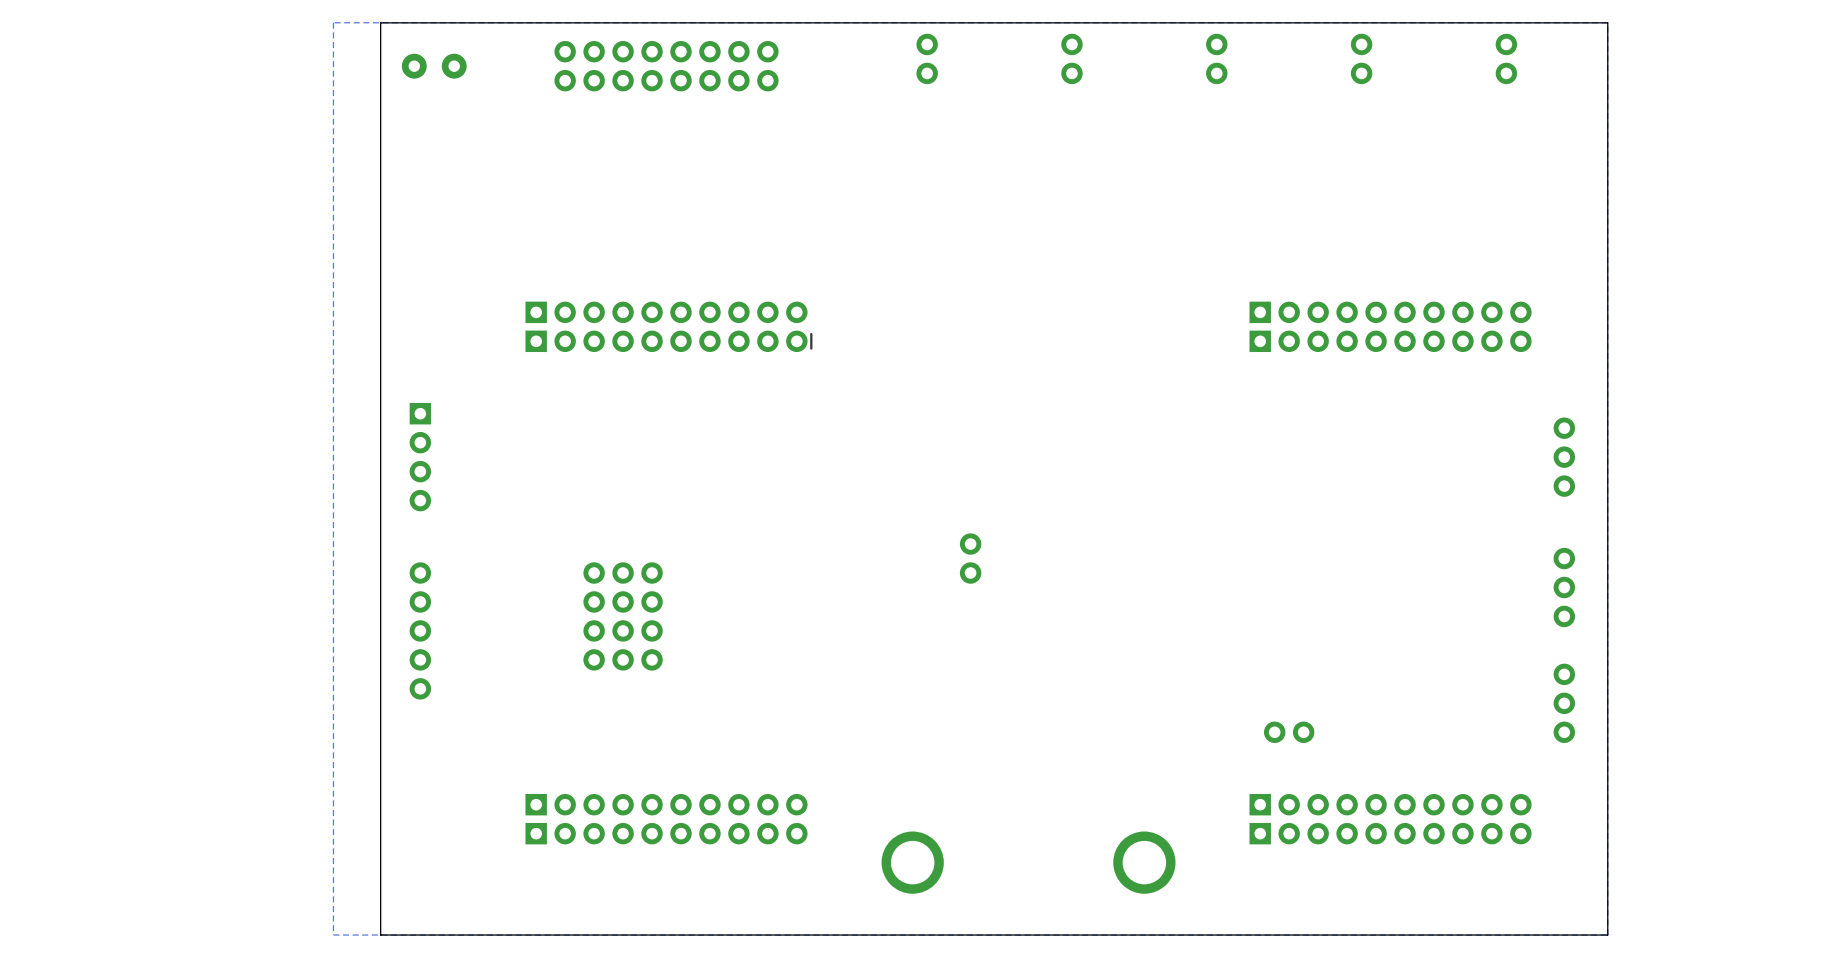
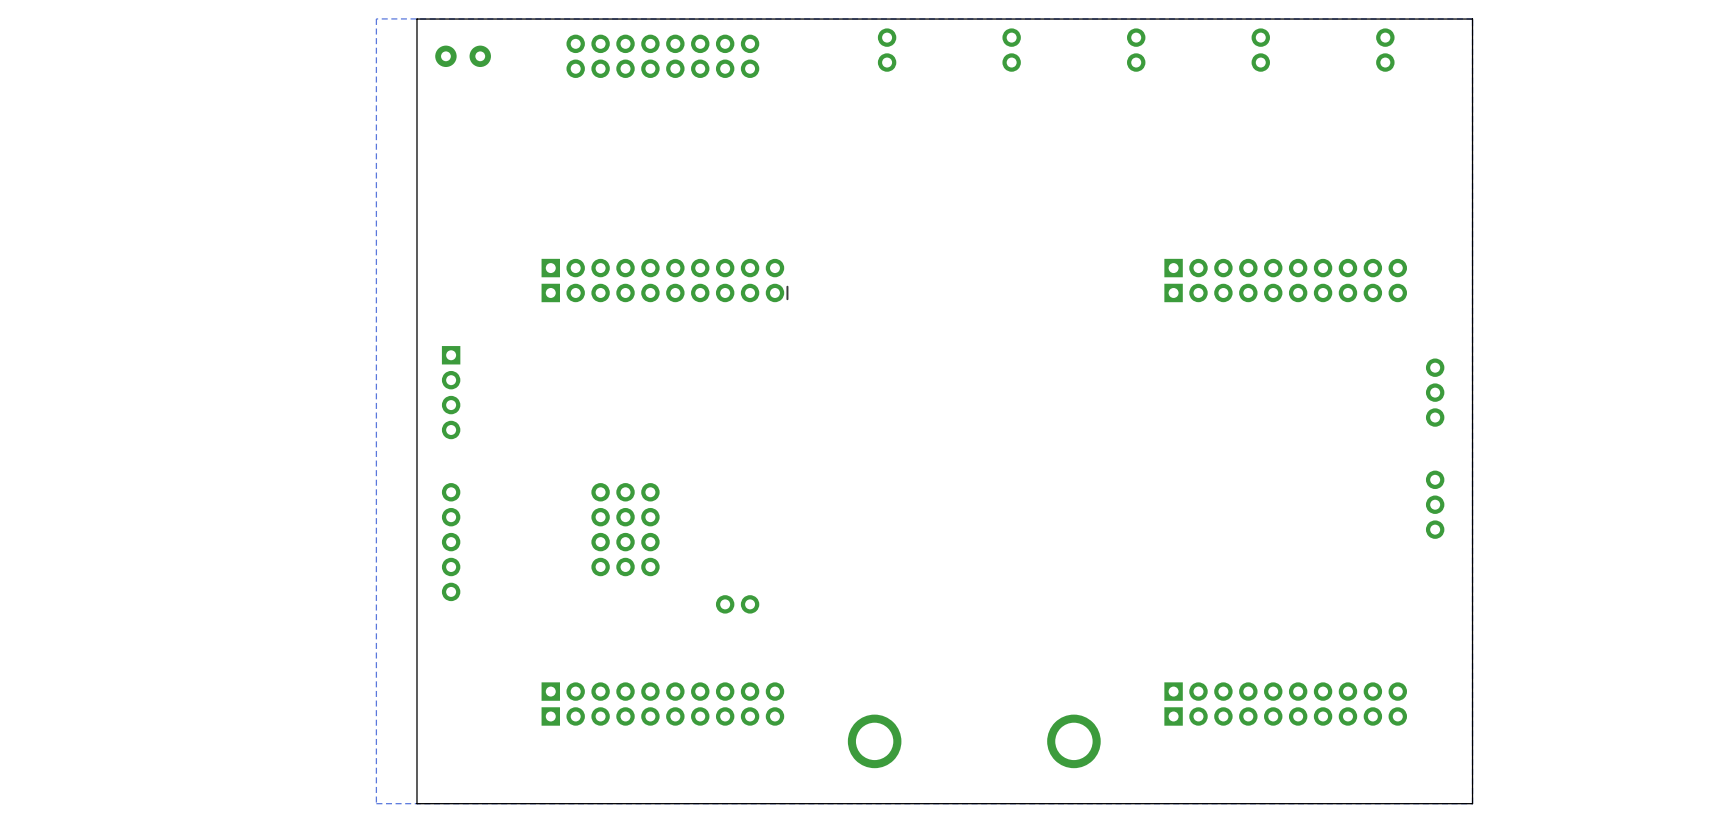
part rotation: 0° (970, 558) -> 90° clockwise (737, 604)
part position: (970, 558) -> (737, 604)
part: (1564, 703) -> none
part: (1289, 732) -> none

